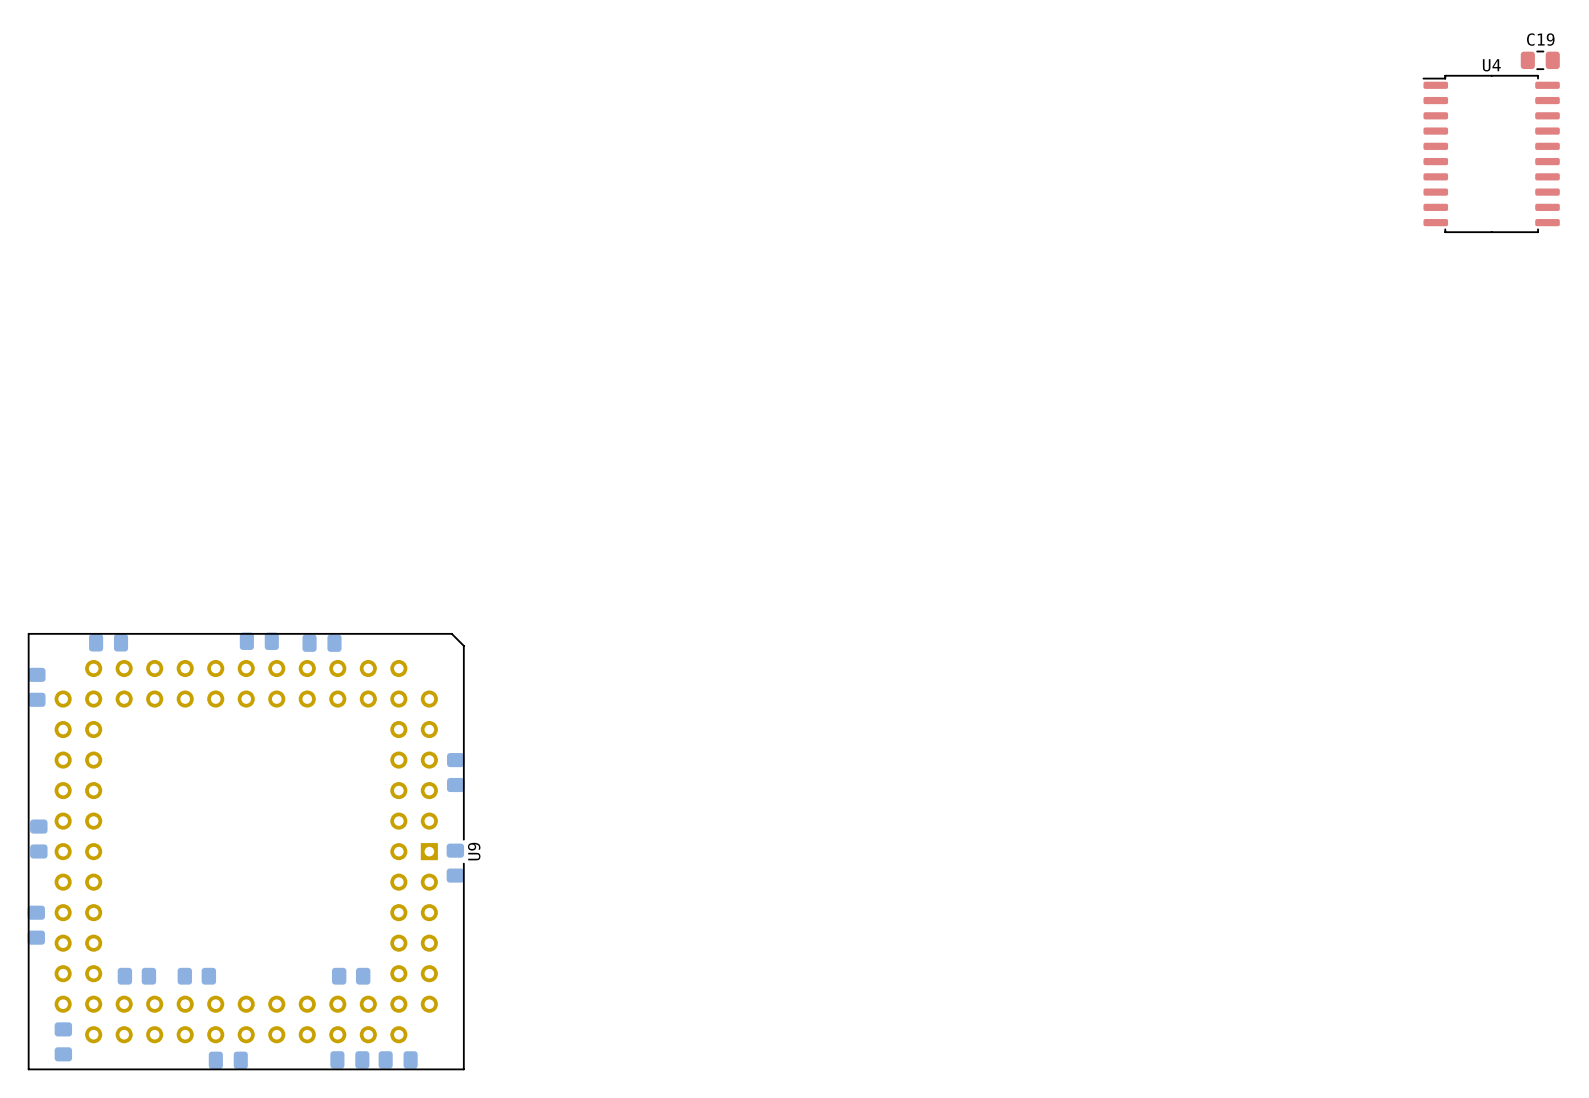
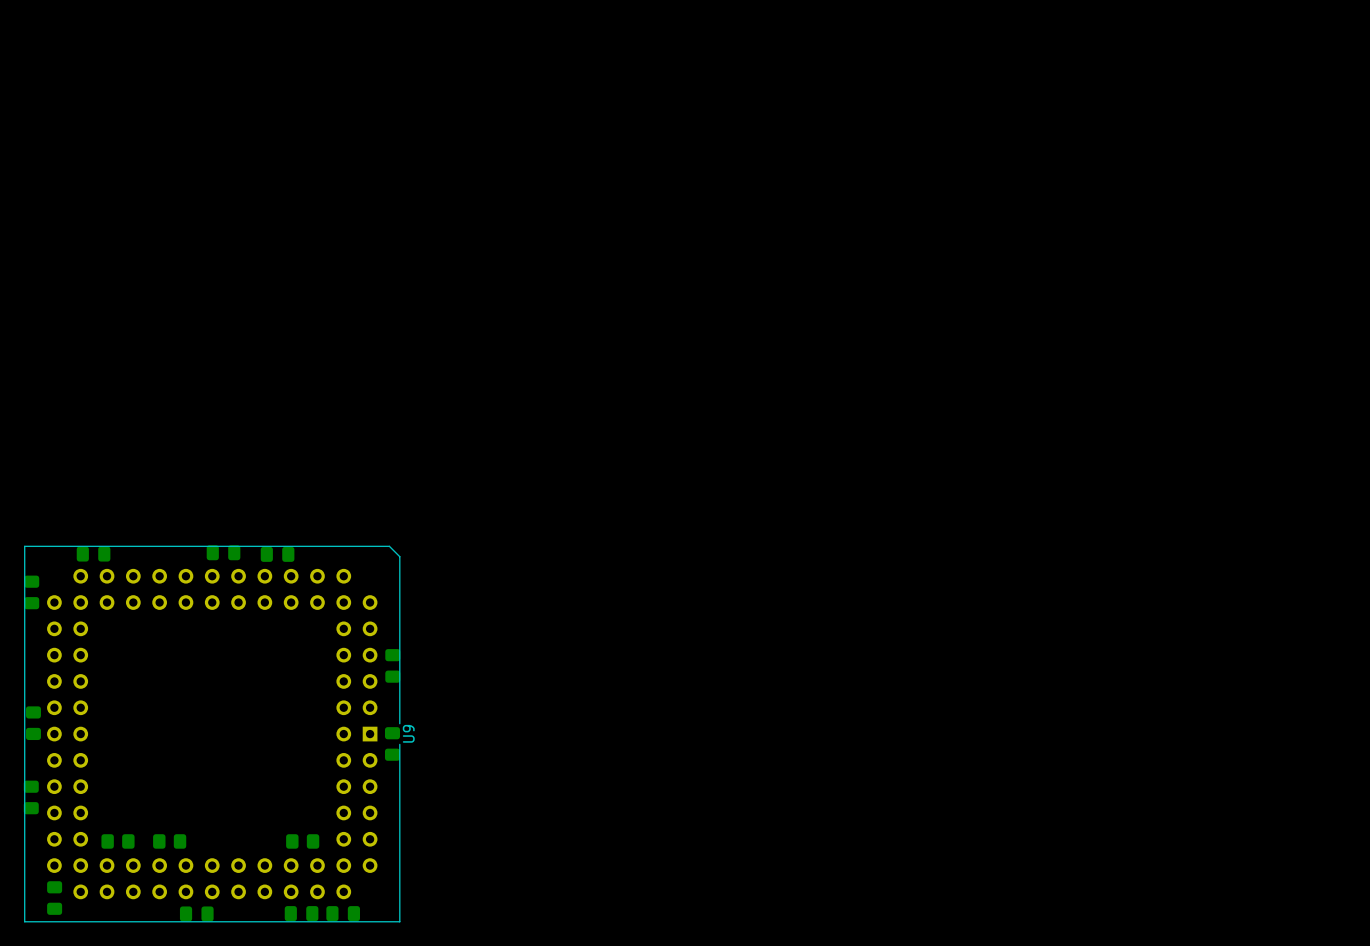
C19: (1540, 60) -> none
U4: (1491, 153) -> none

